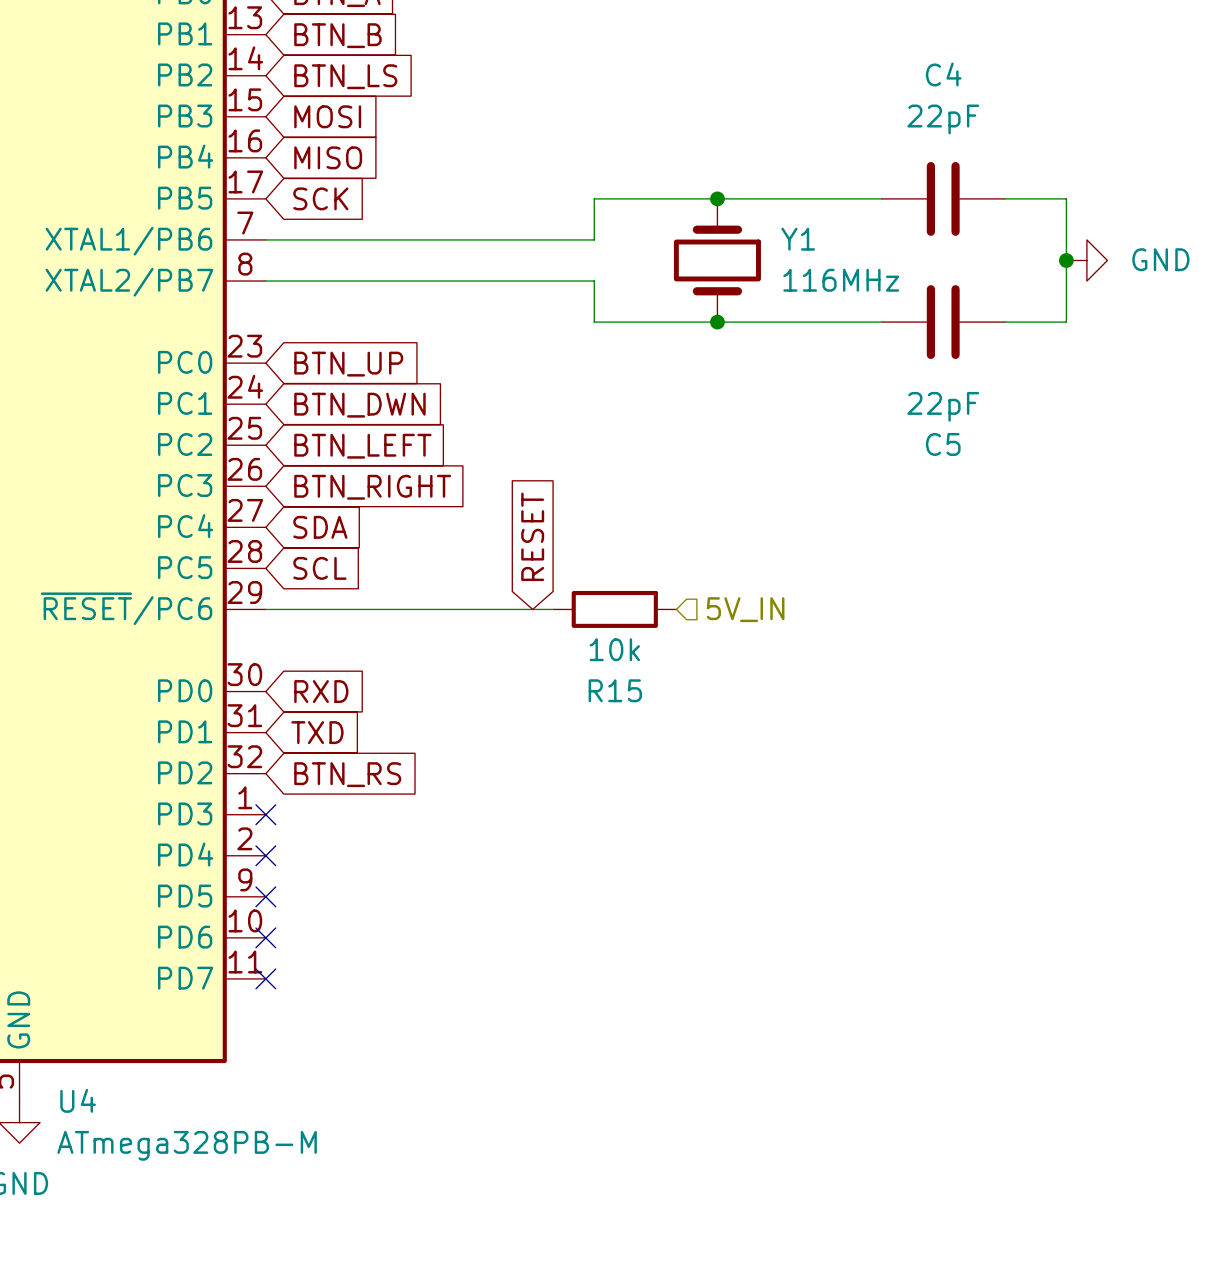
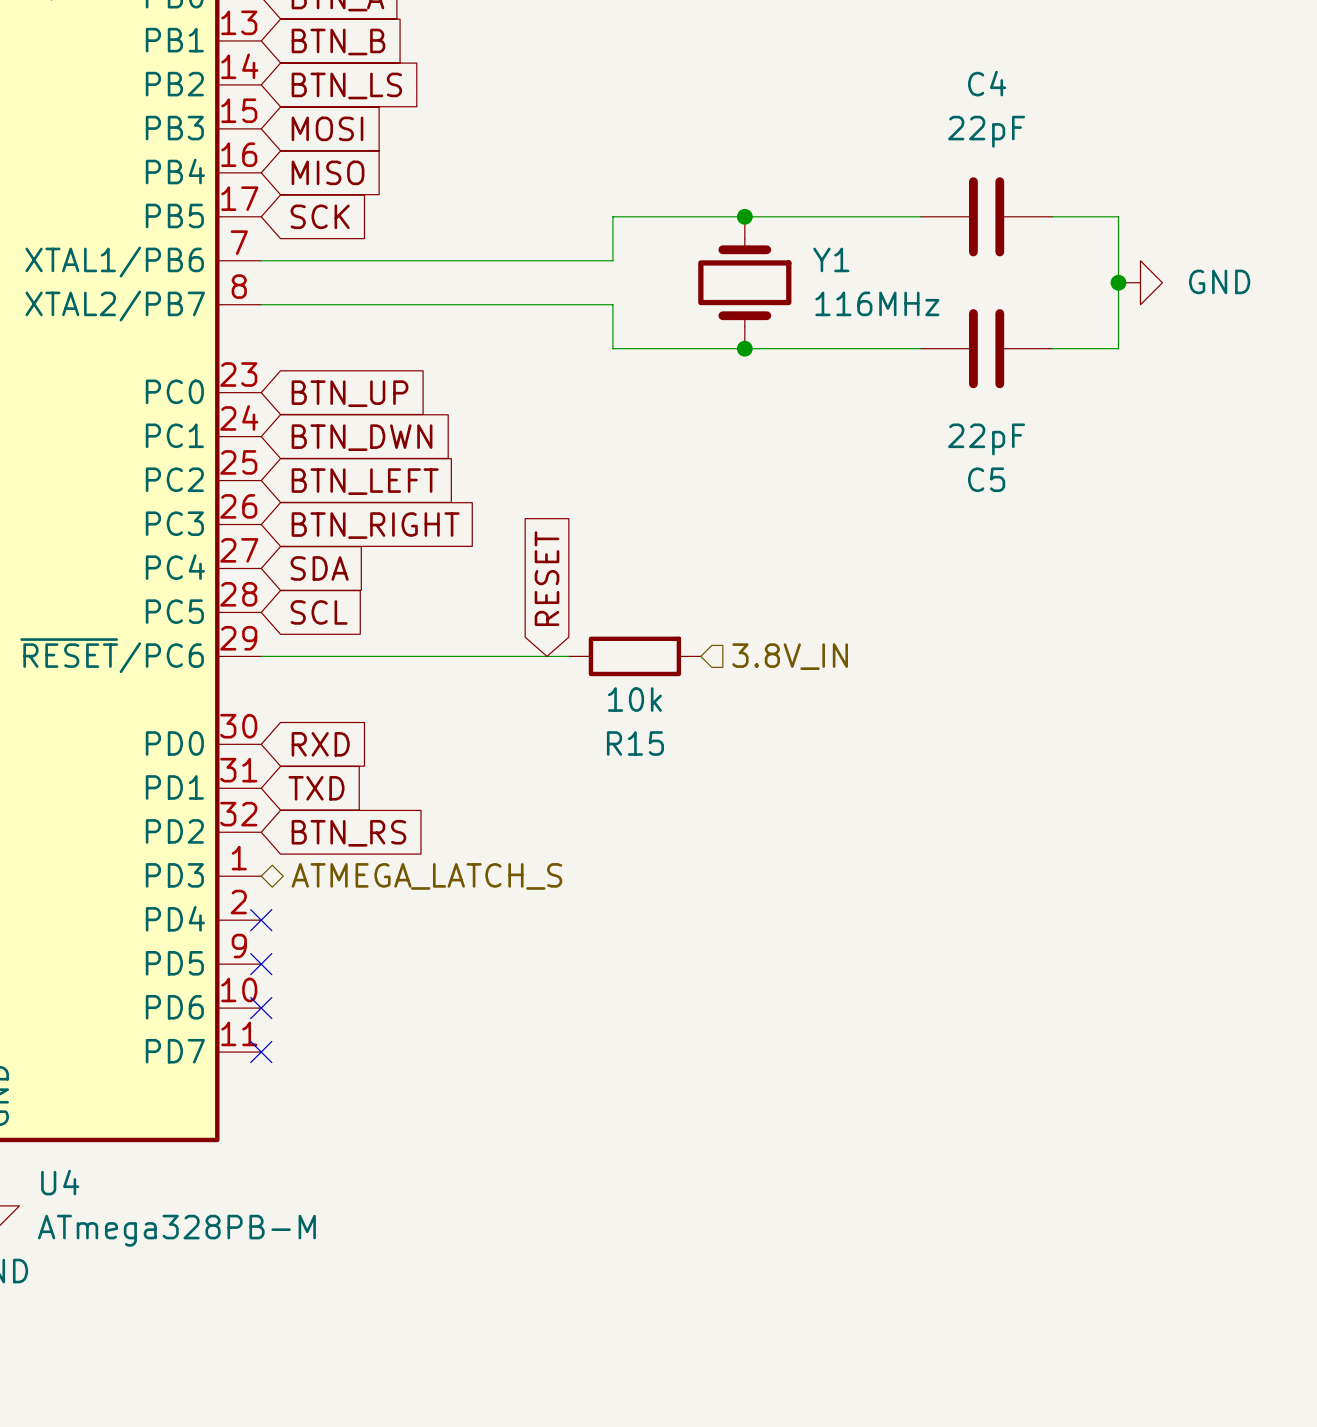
hierarchical label: 5V_IN (745, 609) -> 3.8V_IN (790, 656)
no-connect mark: (265, 814) -> none
hierarchical label: none -> ATMEGA_LATCH_S (426, 876)

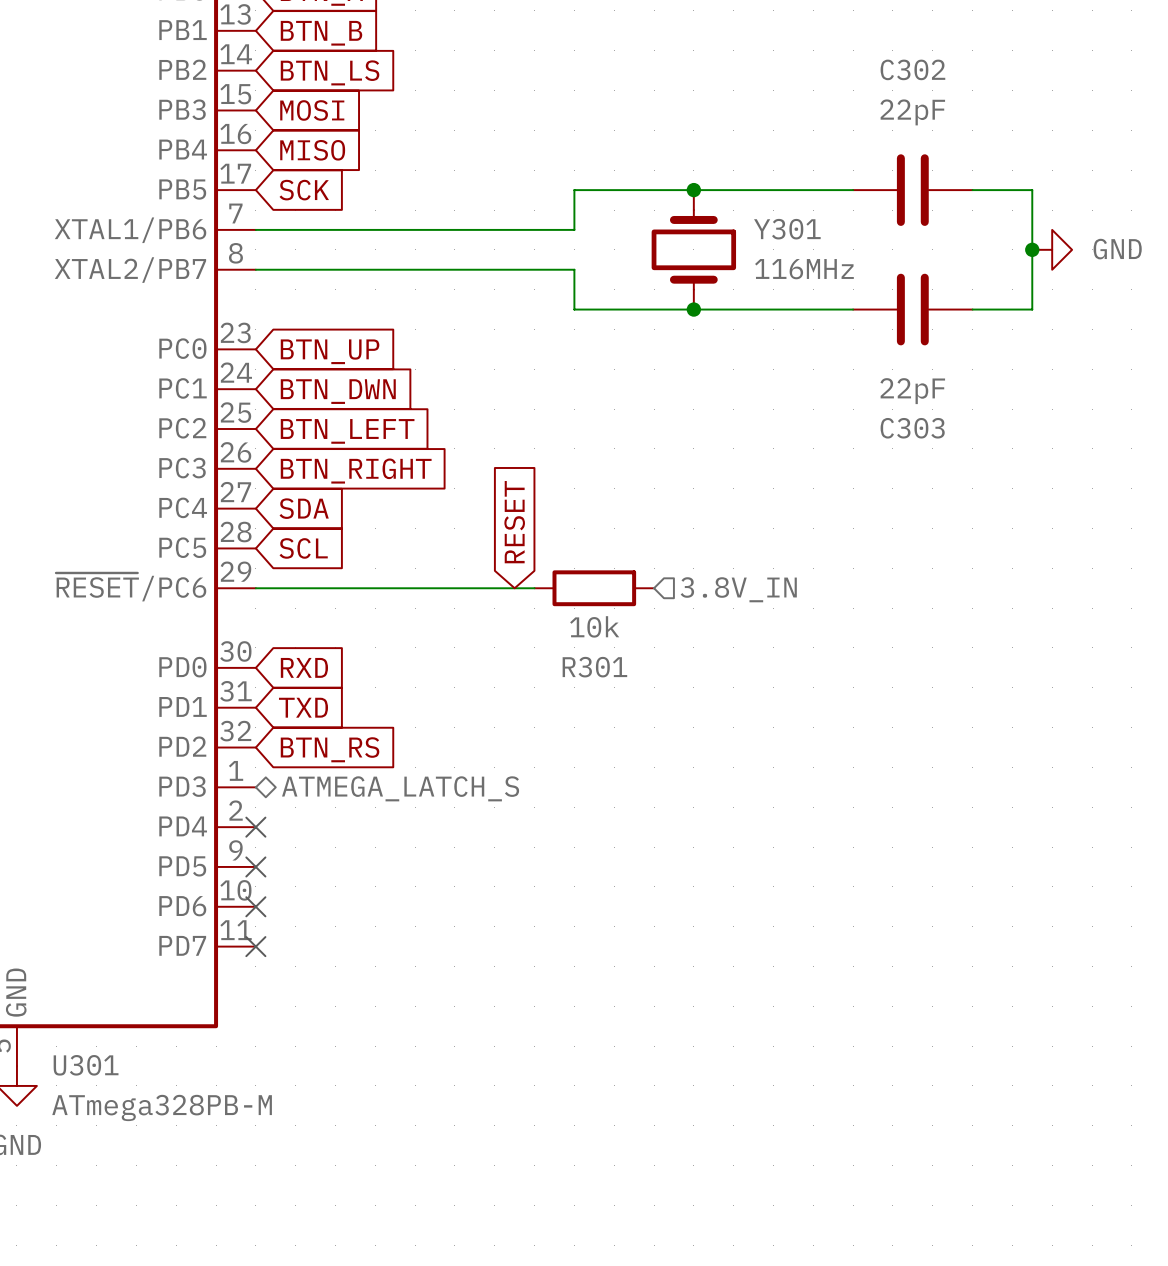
C4 name: C4 (987, 83) -> C302 (912, 69)
Y1 name: Y1 (831, 259) -> Y301 (787, 229)
C5 name: C5 (986, 479) -> C303 (912, 428)
R15 name: R15 (635, 743) -> R301 (594, 667)
U4 name: U4 (60, 1182) -> U301 (86, 1065)

